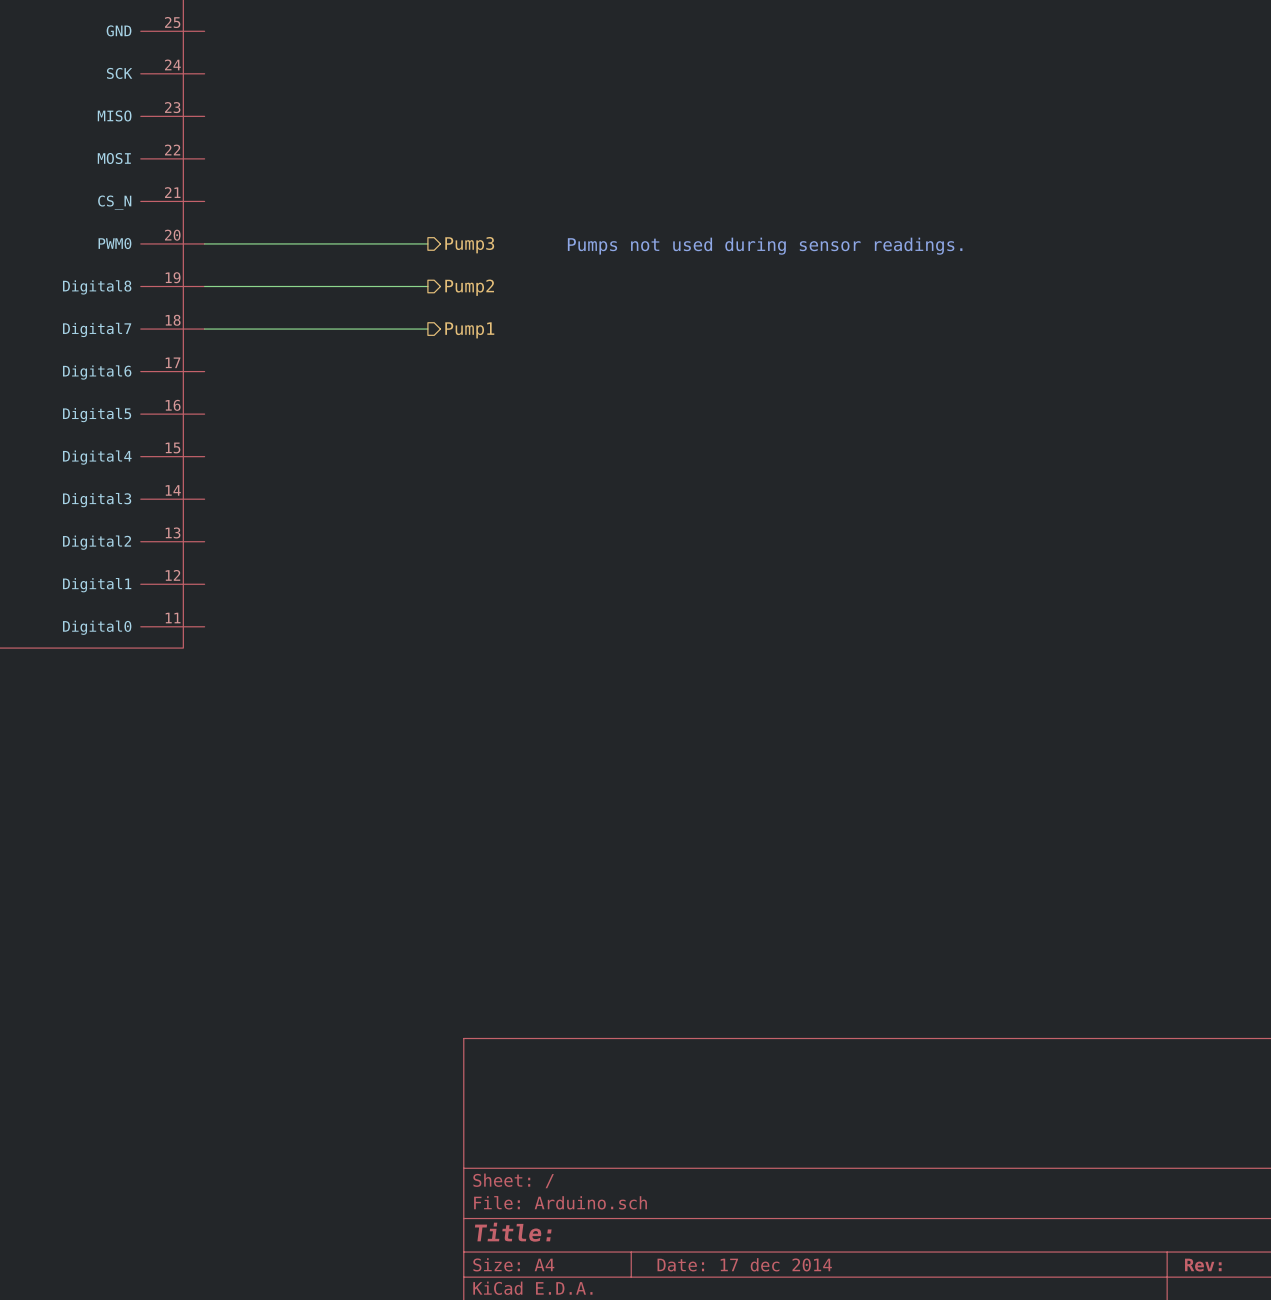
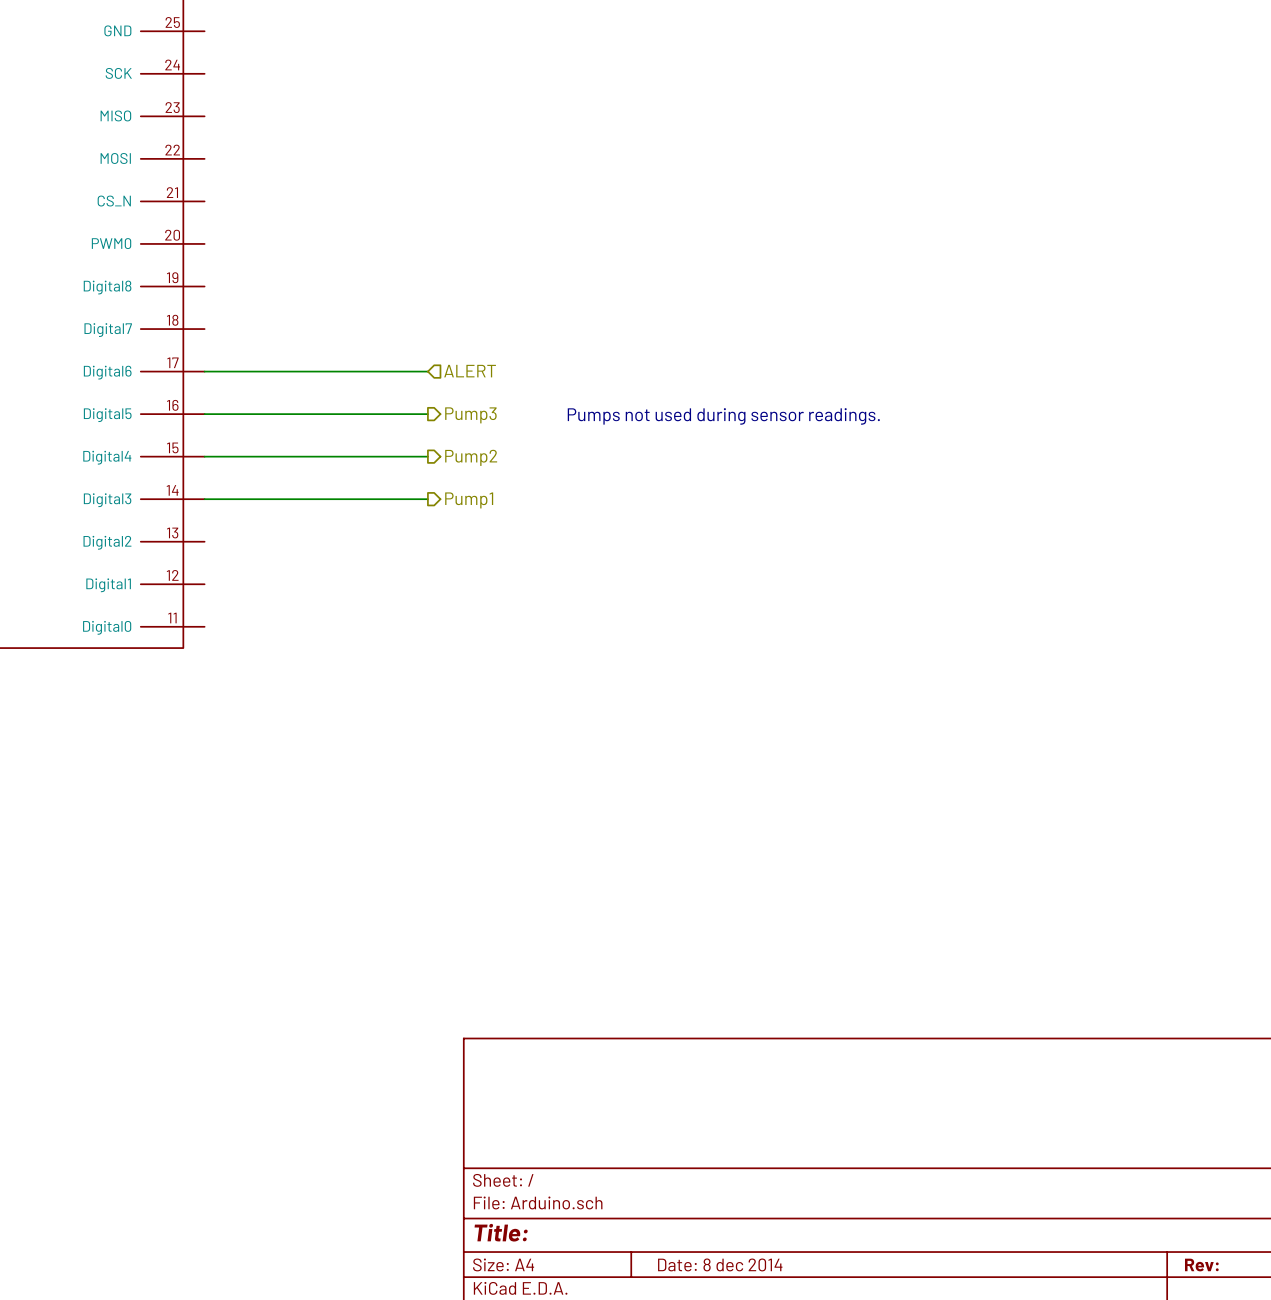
wire: (204, 243) (427, 243) -> none
hierarchical label position: Pump3 (469, 245) -> Pump3 (470, 415)
text position: Pumps not used during sensor readings. (765, 246) -> Pumps not used during sensor readings. (723, 416)
wire: (204, 286) (427, 286) -> (204, 414) (427, 414)
hierarchical label position: Pump2 (469, 287) -> Pump2 (471, 457)
wire: (204, 329) (427, 329) -> (204, 371) (427, 371)
hierarchical label position: Pump1 (469, 330) -> Pump1 (469, 500)
hierarchical label: none -> ALERT (470, 371)
wire: none -> (204, 456) (427, 456)
wire: none -> (204, 499) (427, 499)
title block: Date: 17 dec 2014 (744, 1264) -> Date: 8 dec 2014 (720, 1264)

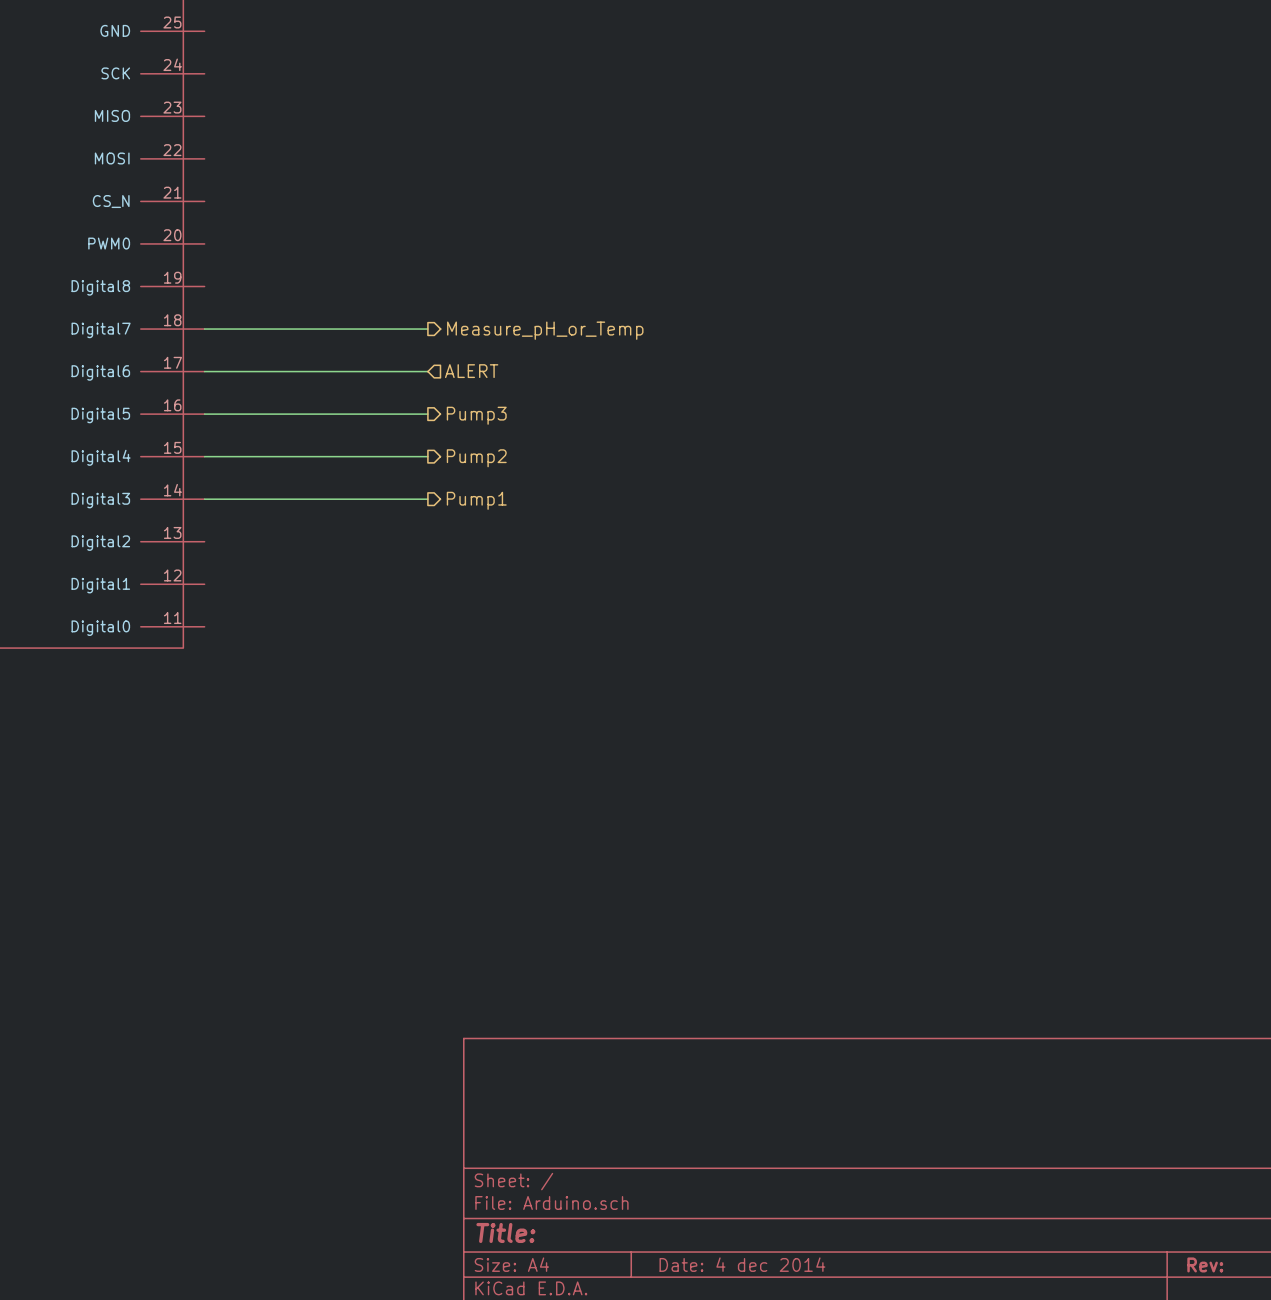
wire: none -> (204, 329) (427, 329)
hierarchical label: none -> Measure_pH_or_Temp (545, 330)
text: Pumps not used during sensor readings. (723, 416) -> none
title block: Date: 8 dec 2014 (720, 1264) -> Date: 4 dec 2014 (742, 1264)

